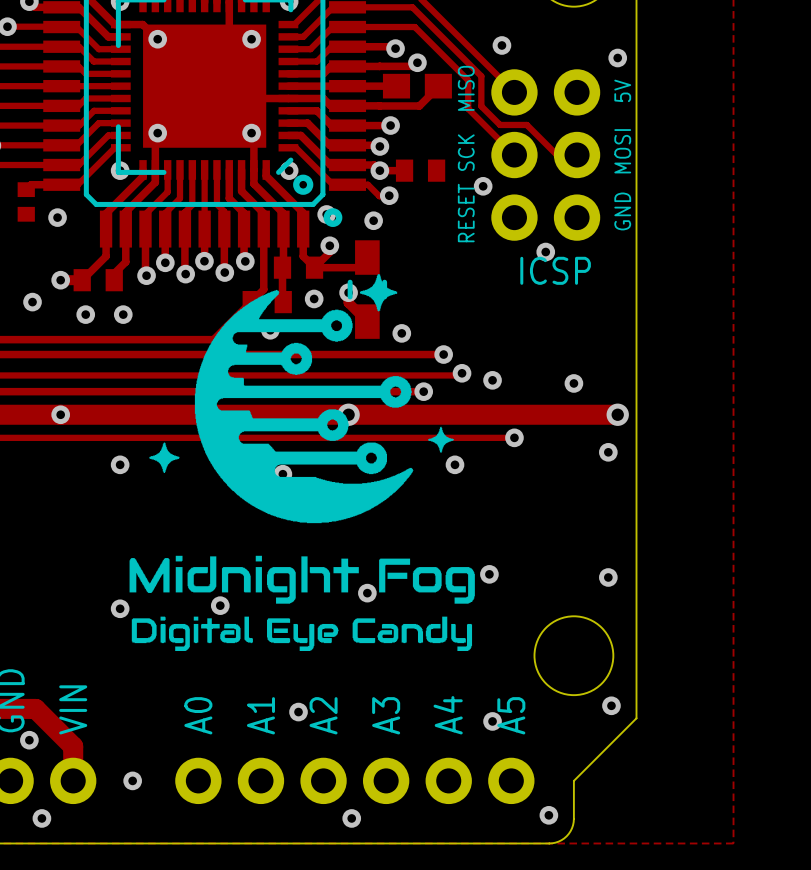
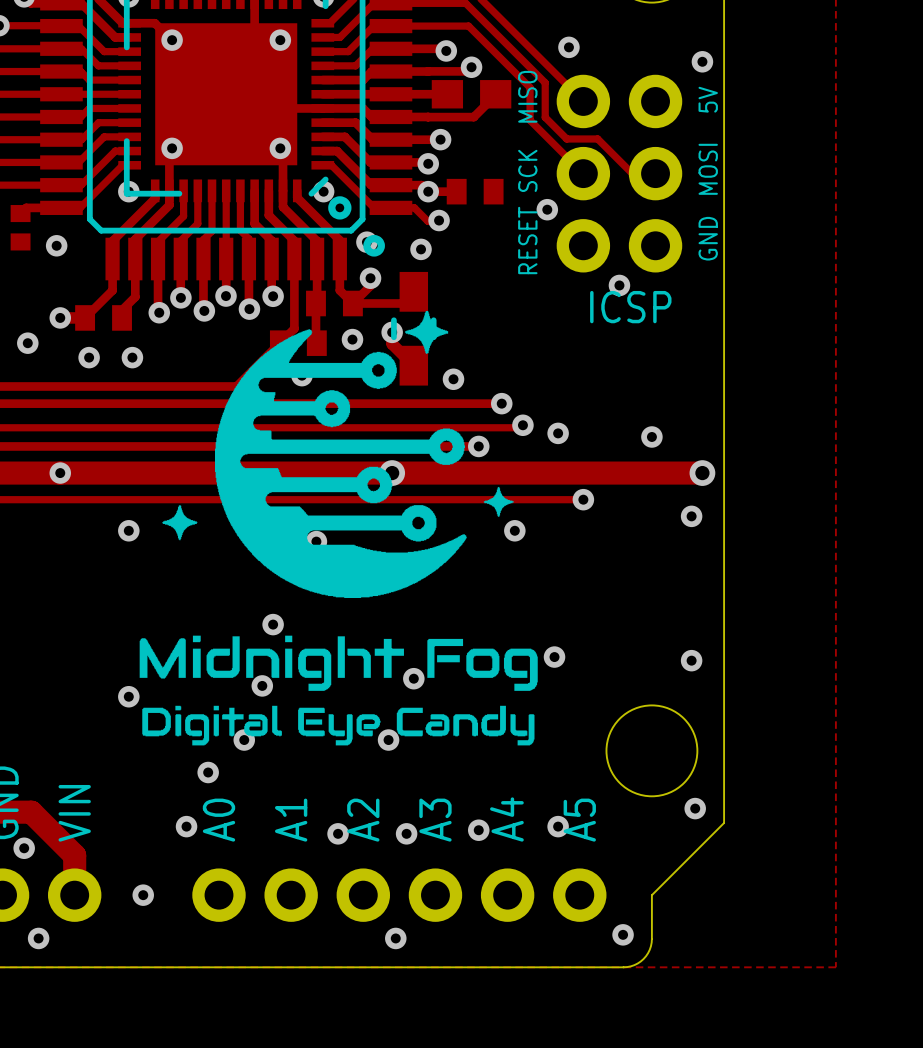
via: none -> (273, 624)
via position: (220, 605) -> (262, 685)
via: none -> (244, 740)
via: none -> (388, 740)
via: none -> (208, 772)
via position: (298, 712) -> (338, 833)
via: none -> (186, 826)
via: none -> (478, 830)
via: none -> (406, 833)

